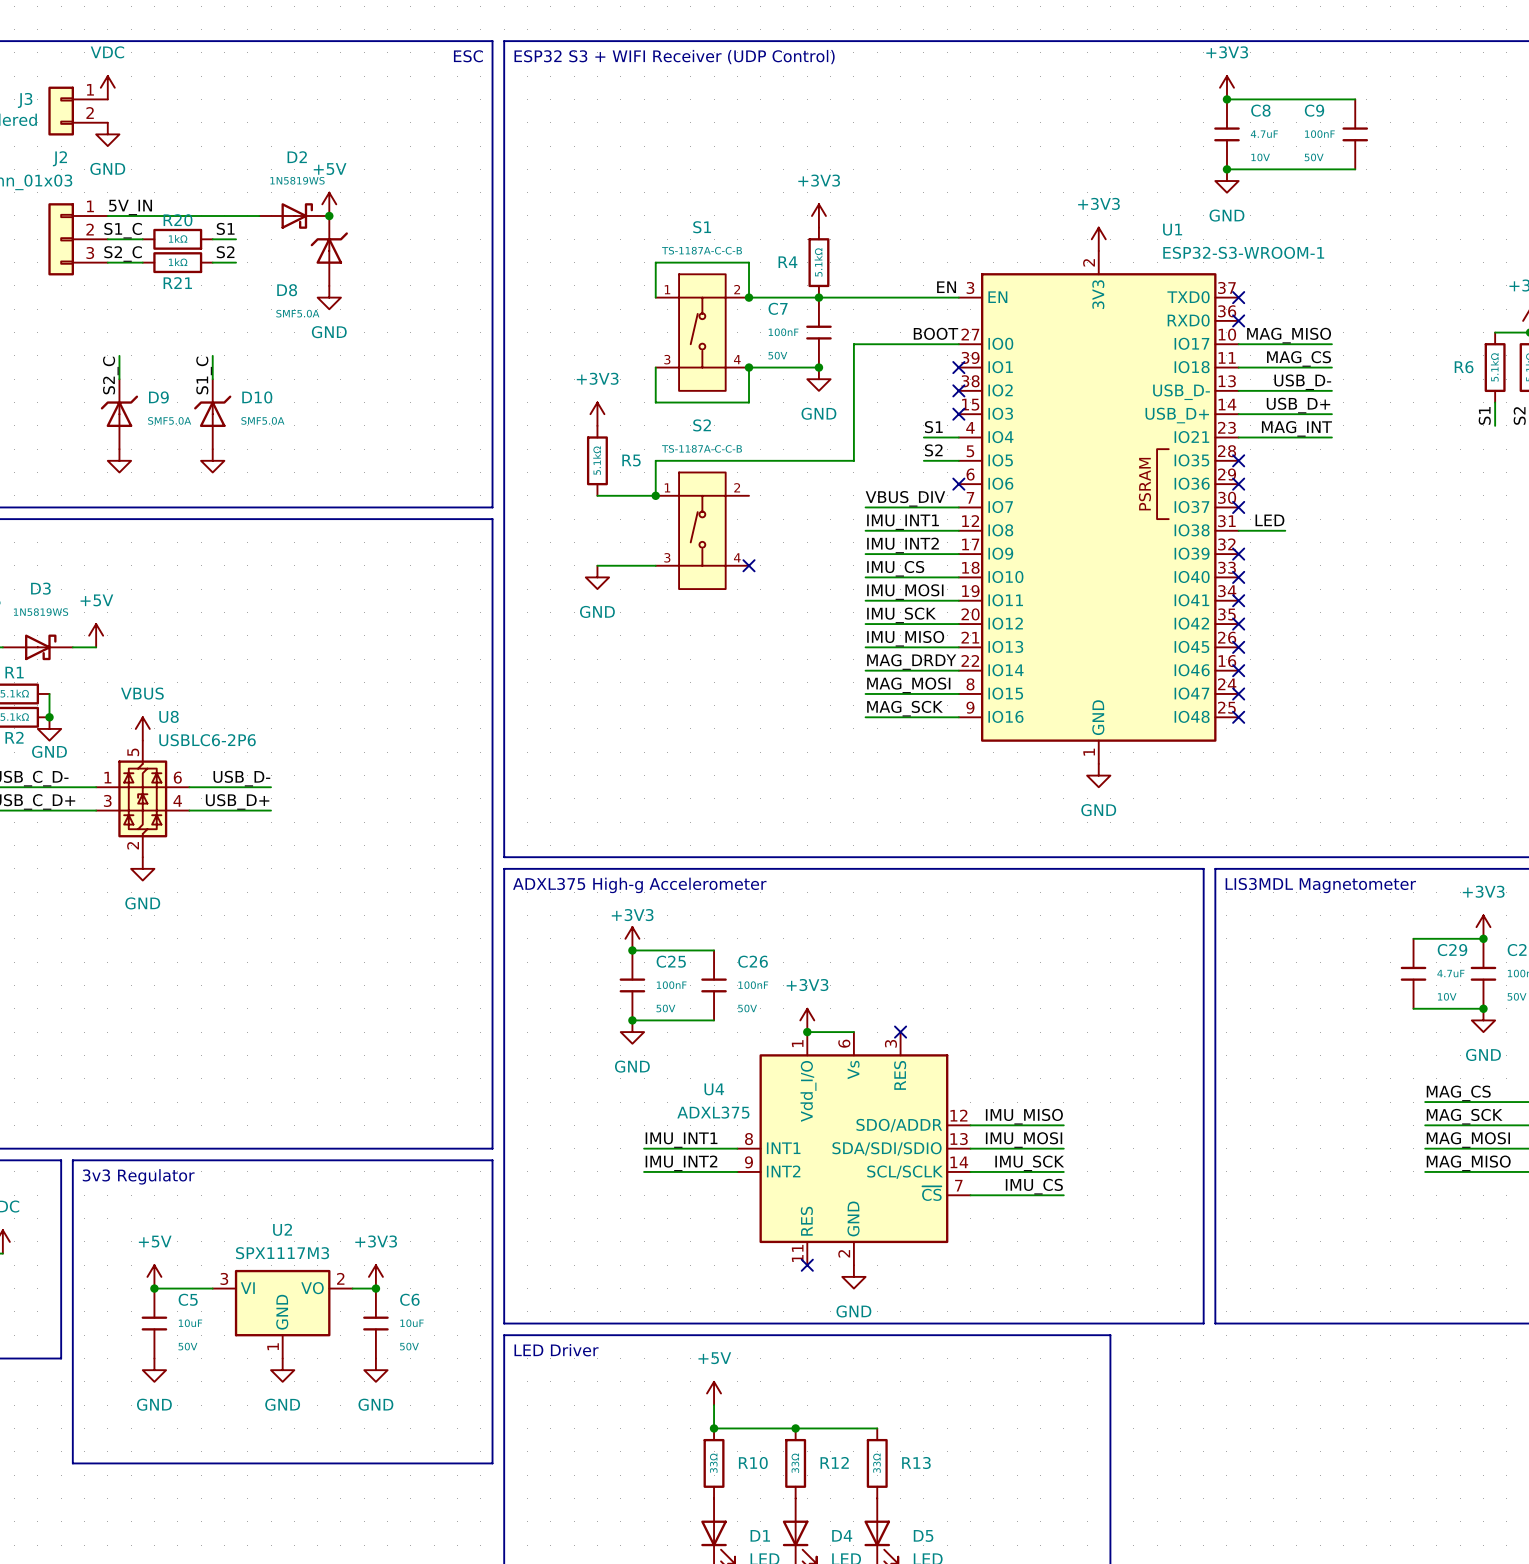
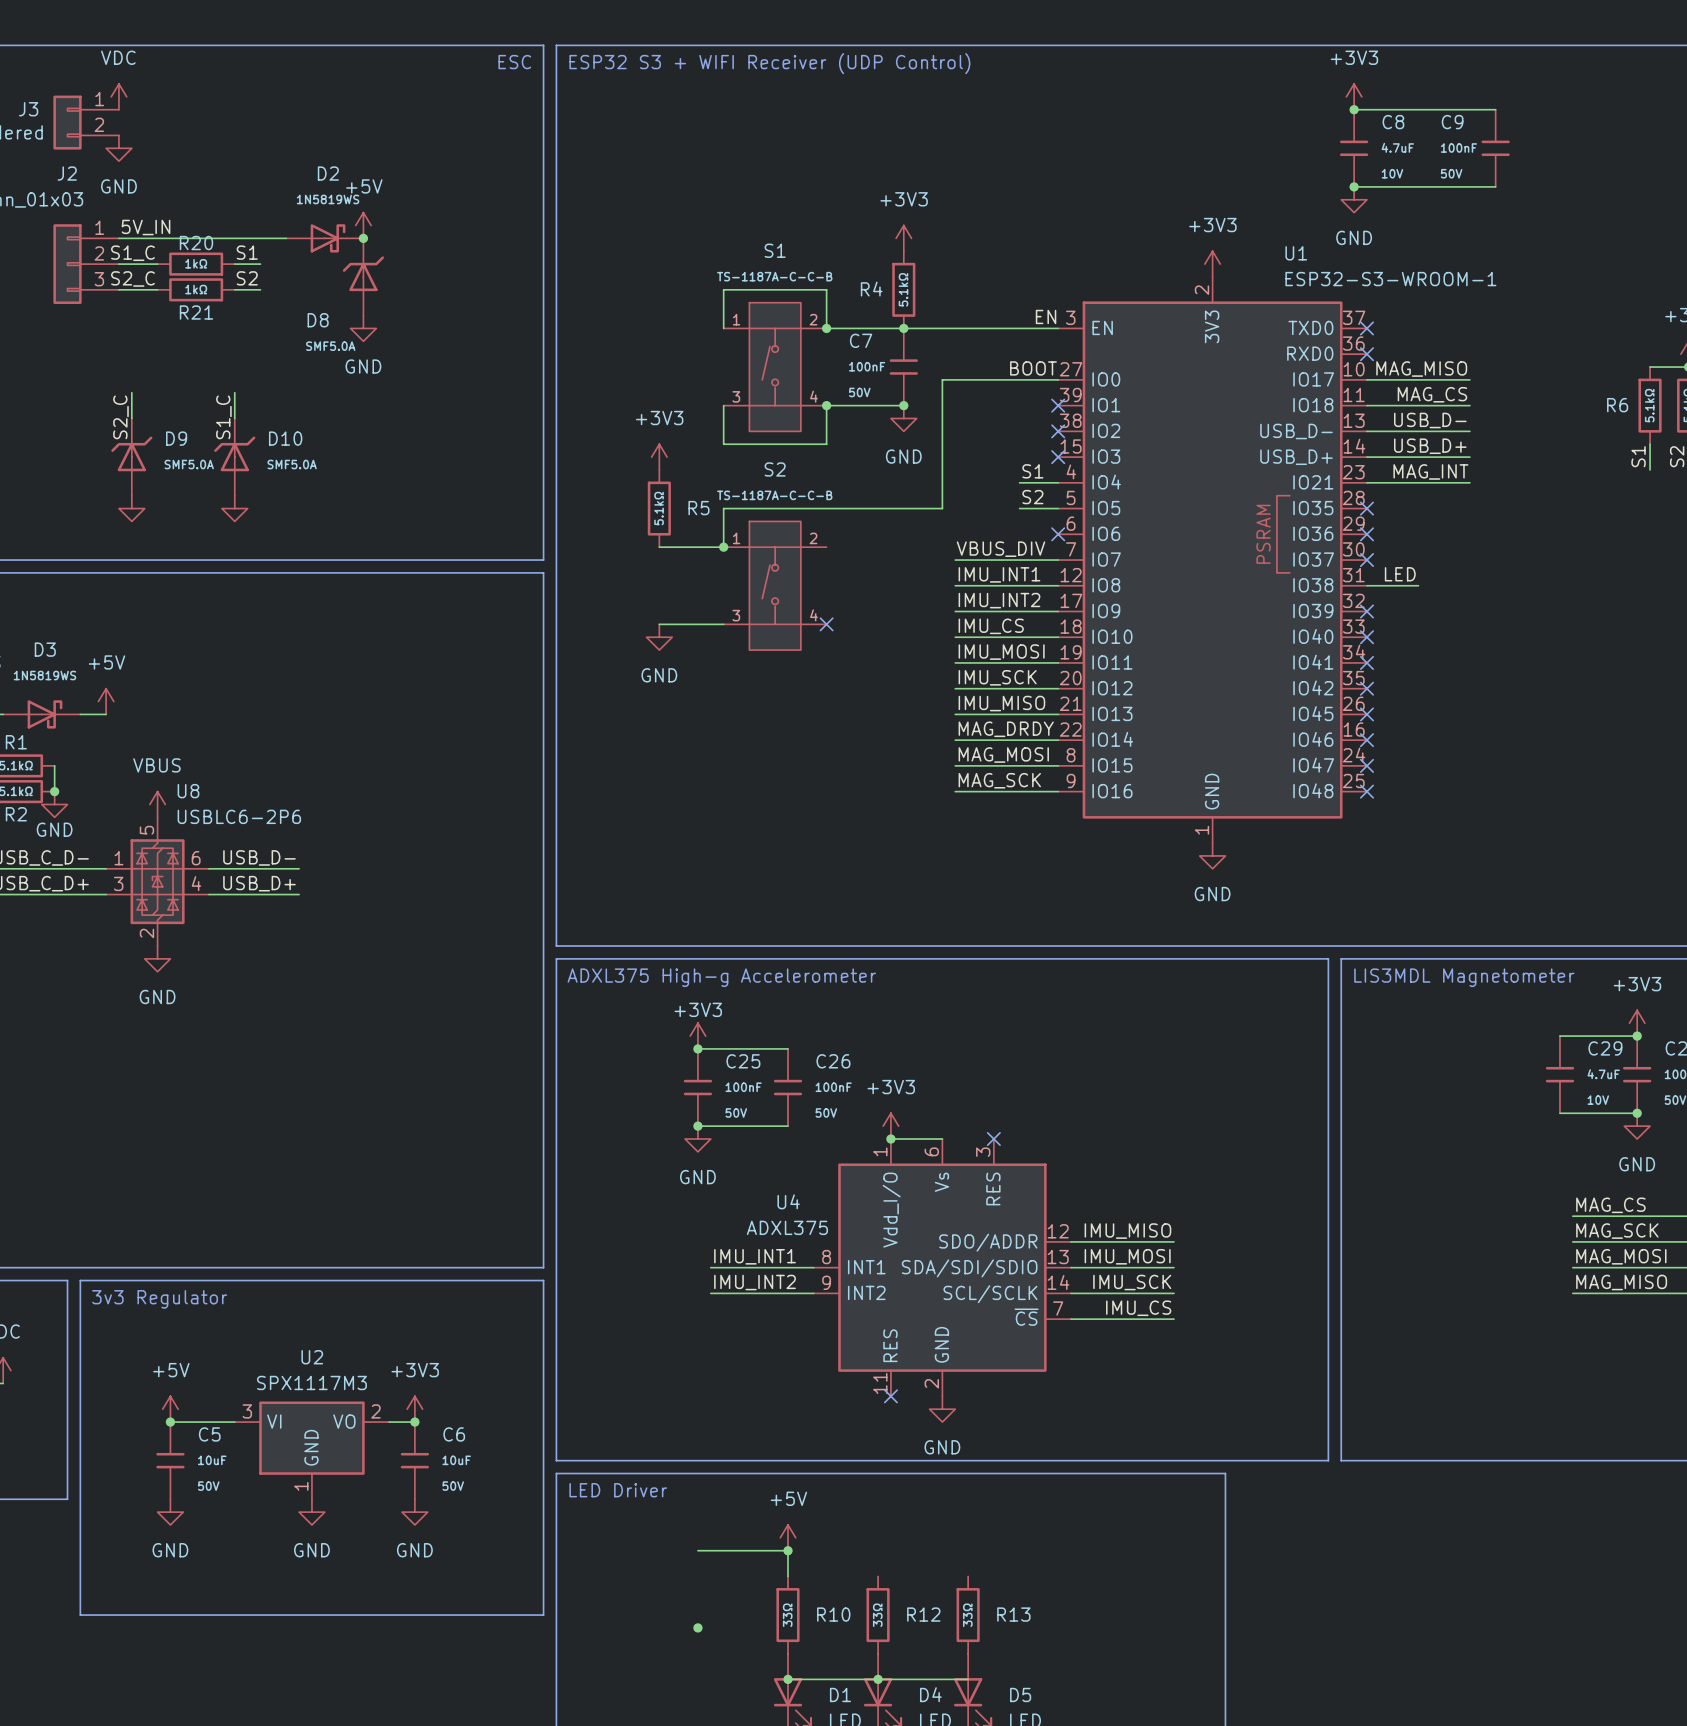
wire: none -> (697, 1550) (788, 1550)
wire: (714, 1428) (877, 1428) -> (788, 1679) (968, 1679)
junction position: (714, 1428) -> (788, 1550)
junction: (795, 1428) -> none
junction: none -> (697, 1627)
junction: none -> (788, 1679)
junction: none -> (878, 1679)

